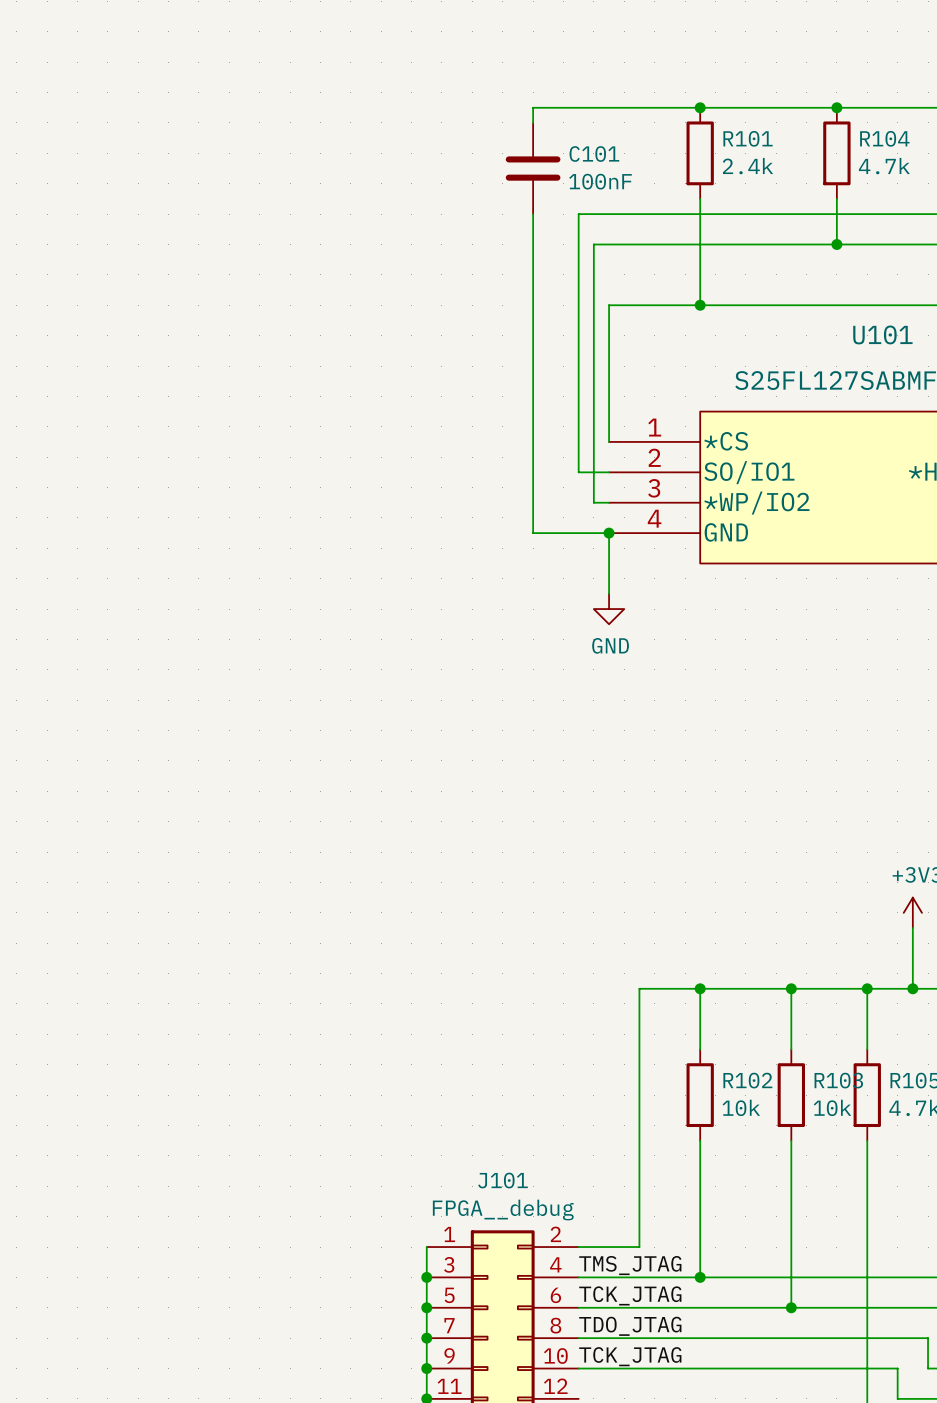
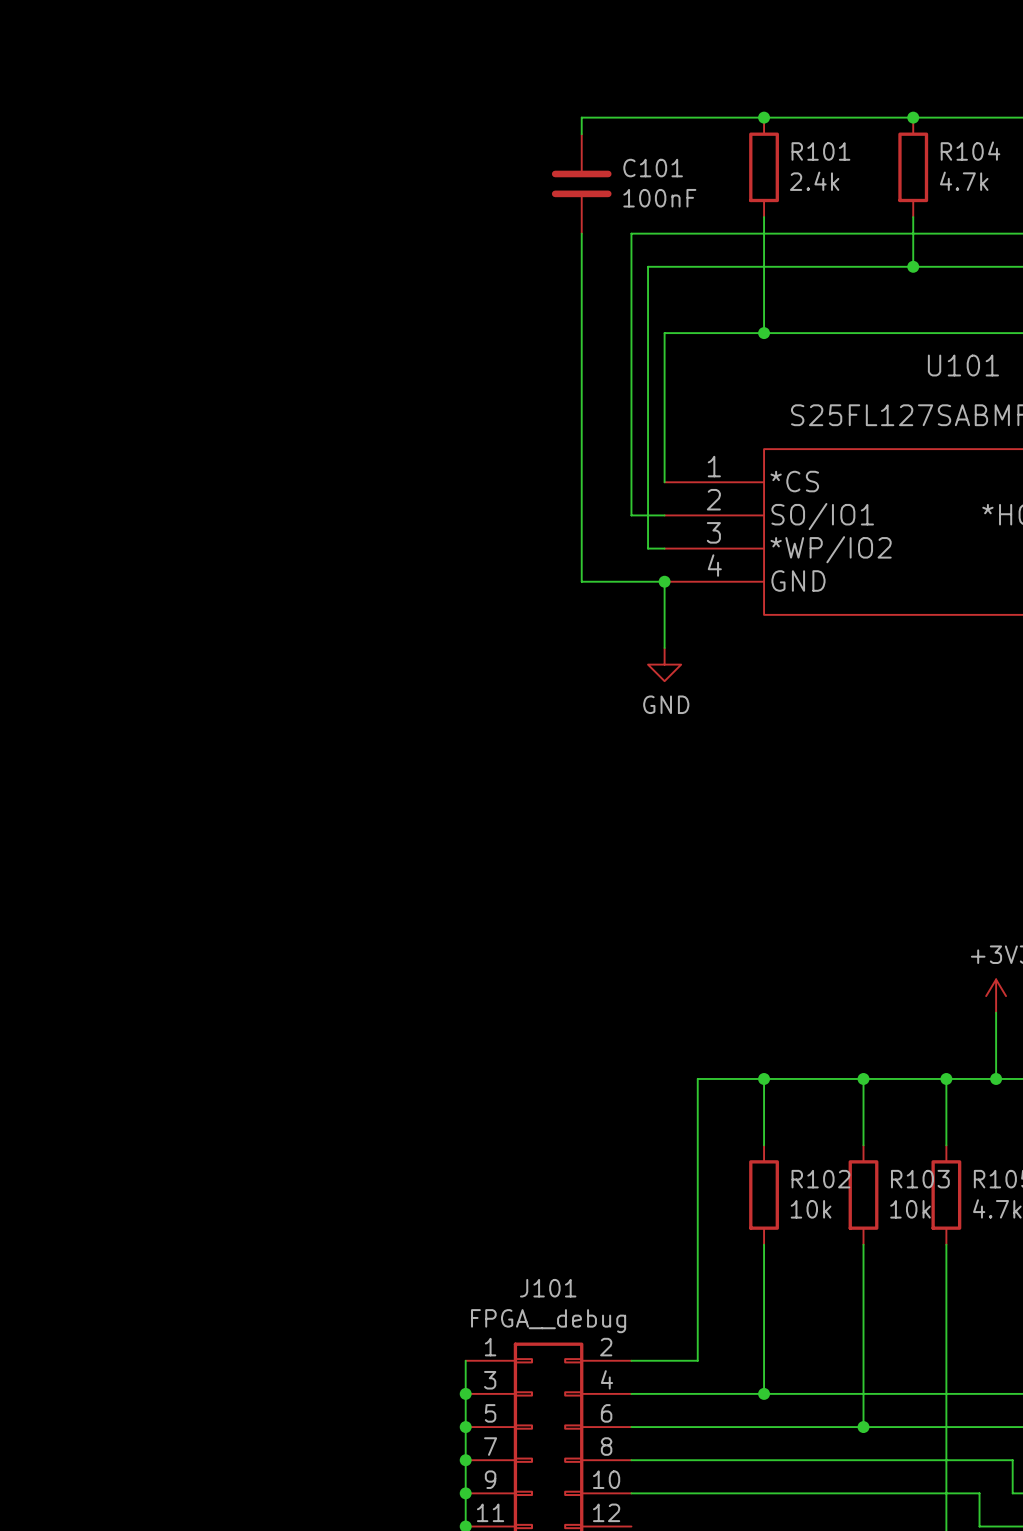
label: TMS_JTAG (630, 1265) -> none
label: TCK_JTAG (630, 1295) -> none
label: TDO_JTAG (630, 1326) -> none
label: TCK_JTAG (630, 1356) -> none

